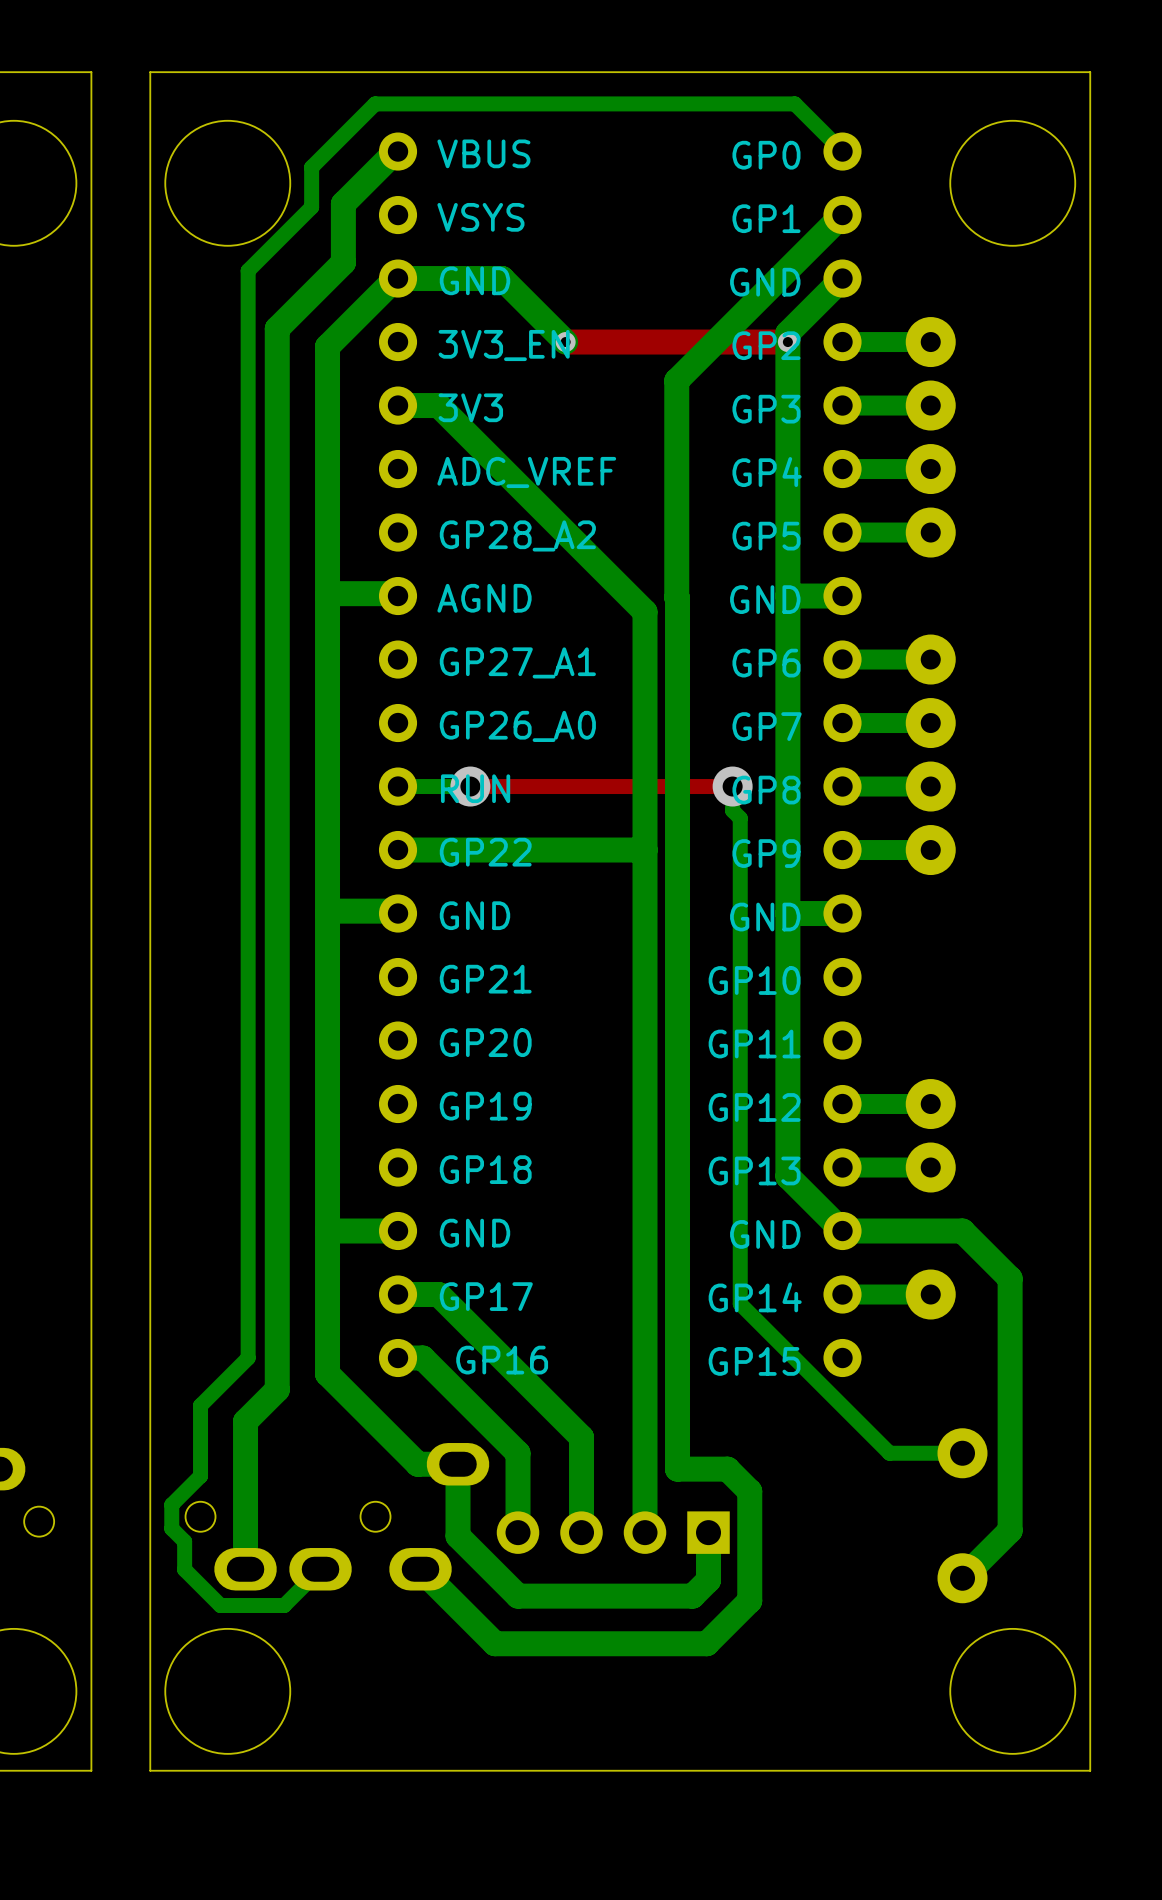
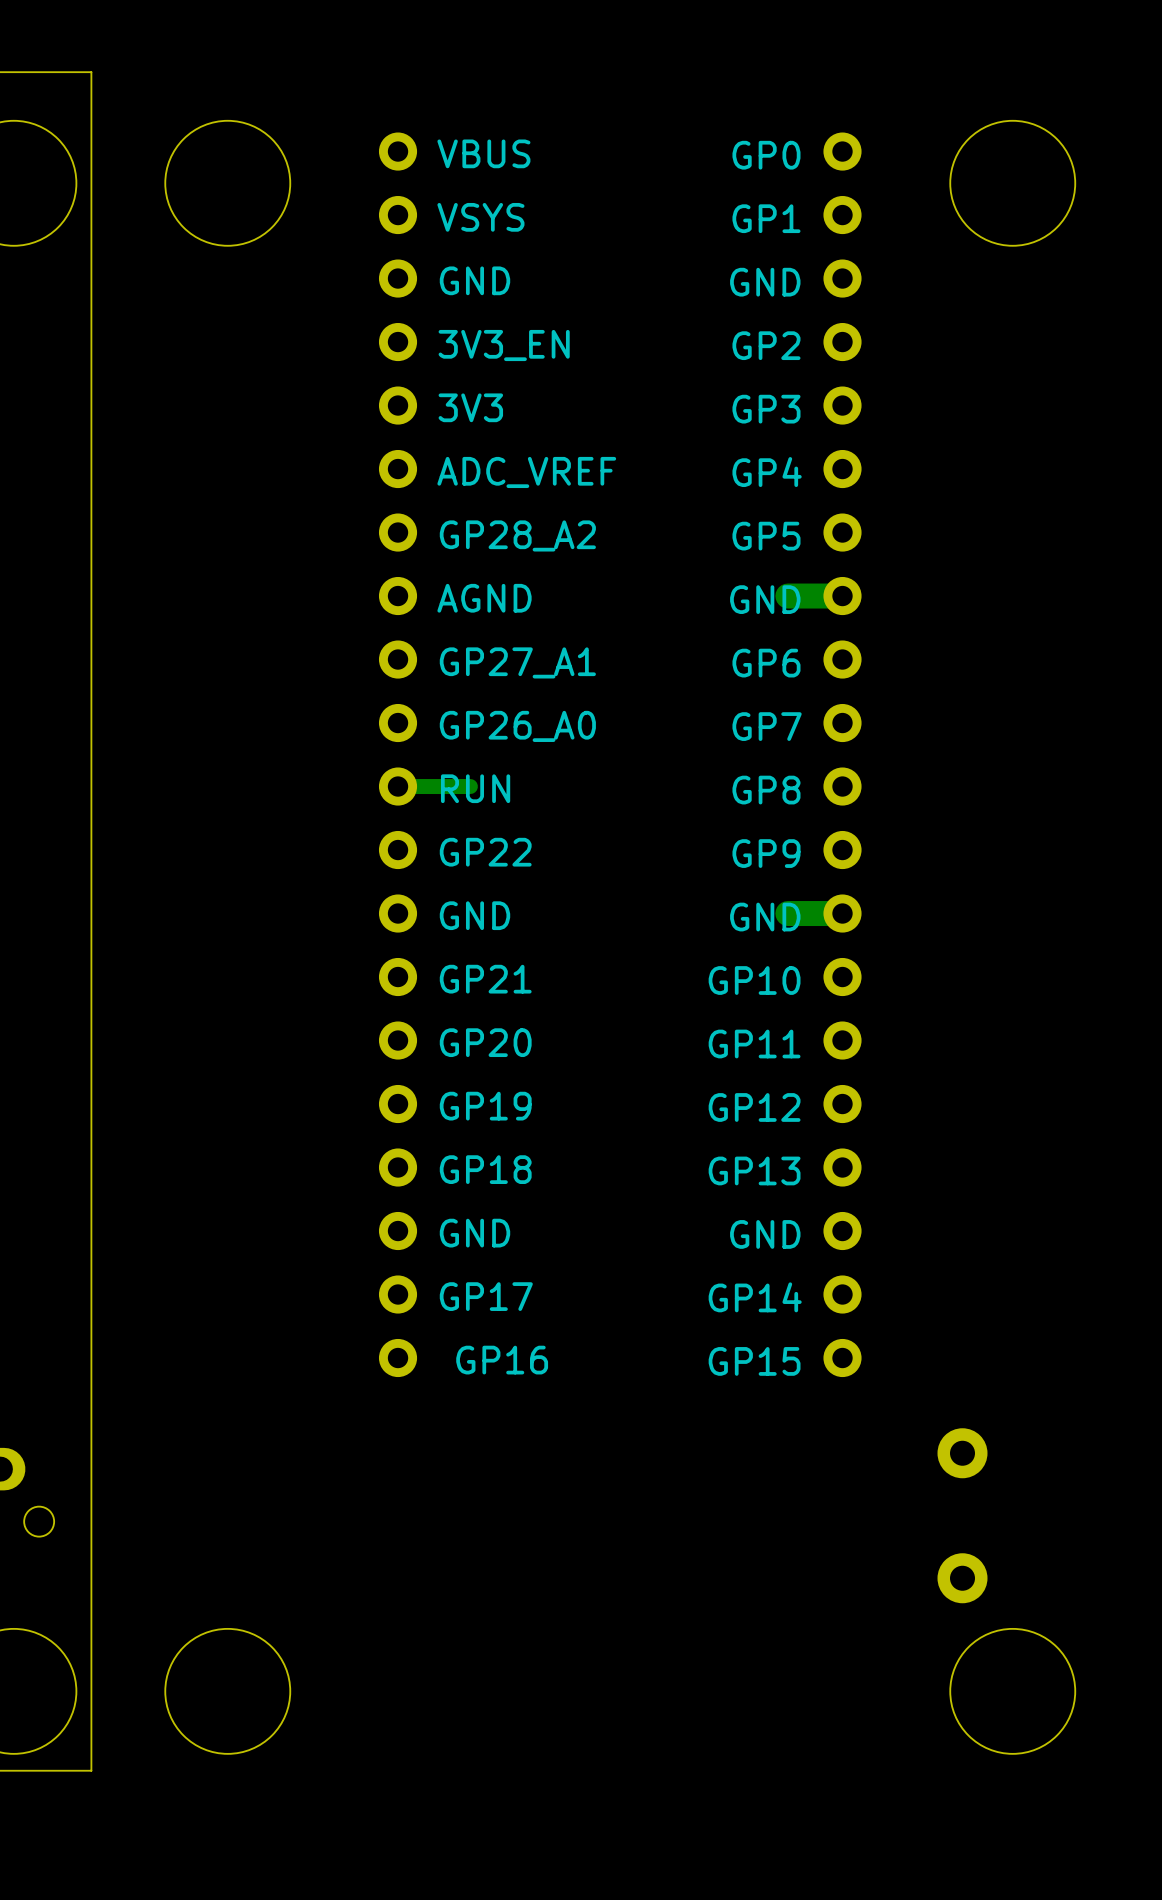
board edge: (1090, 72) (150, 72) (150, 1770) (1090, 1770) (1090, 72) -> none
bottom track: (398, 149) (343, 203) (343, 262) (277, 328) (277, 1389) (245, 1421) (245, 1569) -> none
bottom track: (842, 151) (794, 103) (375, 103) (311, 167) (311, 207) (248, 270) (248, 1358) (200, 1405) (200, 1476) (171, 1504) (171, 1528) (184, 1541) (184, 1569) (220, 1605) (284, 1605) (320, 1569) -> none
bottom track: (842, 215) (676, 380) (677, 1469) (727, 1469) (749, 1491) (749, 1600) (706, 1643) (495, 1643) (420, 1569) -> none
bottom track: (398, 276) (327, 346) (327, 1373) (417, 1464) (458, 1464) (458, 1536) (518, 1596) (692, 1596) (708, 1580) (708, 1532) -> none
bottom track: (398, 278) (502, 278) (565, 342) -> none
bottom track: (842, 278) (787, 333) (787, 1176) (842, 1231) (962, 1231) (1010, 1278) (1010, 1530) (962, 1578) -> none
via: (565, 342) -> none
top track: (787, 342) (565, 342) -> none
via: (787, 342) -> none
bottom track: (930, 342) (842, 342) -> none
part: (930, 342) -> none
bottom track: (398, 405) (438, 405) (645, 611) (645, 1532) -> none
bottom track: (930, 405) (842, 405) -> none
part: (930, 405) -> none
bottom track: (930, 469) (842, 469) -> none
part: (930, 469) -> none
bottom track: (930, 532) (842, 532) -> none
part: (930, 532) -> none
bottom track: (398, 593) (329, 593) (327, 596) -> none
bottom track: (930, 659) (842, 659) -> none
part: (930, 659) -> none
bottom track: (930, 723) (842, 723) -> none
part: (930, 723) -> none
via: (470, 786) -> none
bottom track: (732, 786) (732, 810) (740, 818) (740, 1303) (889, 1453) (962, 1453) -> none
top track: (732, 786) (470, 786) -> none
via: (732, 786) -> none
bottom track: (930, 786) (842, 786) -> none
part: (930, 786) -> none
bottom track: (645, 850) (398, 850) -> none
bottom track: (930, 850) (842, 850) -> none
part: (930, 850) -> none
bottom track: (398, 911) (329, 911) (327, 913) -> none
bottom track: (930, 1104) (842, 1104) -> none
part: (930, 1104) -> none
bottom track: (930, 1167) (842, 1167) -> none
part: (930, 1167) -> none
bottom track: (398, 1231) (327, 1231) -> none
bottom track: (398, 1294) (438, 1294) (581, 1437) (581, 1532) -> none
bottom track: (930, 1294) (842, 1294) -> none
part: (930, 1294) -> none
bottom track: (398, 1358) (422, 1358) (518, 1453) (518, 1532) -> none
part: (337, 1516) -> none
part: (613, 1532) -> none

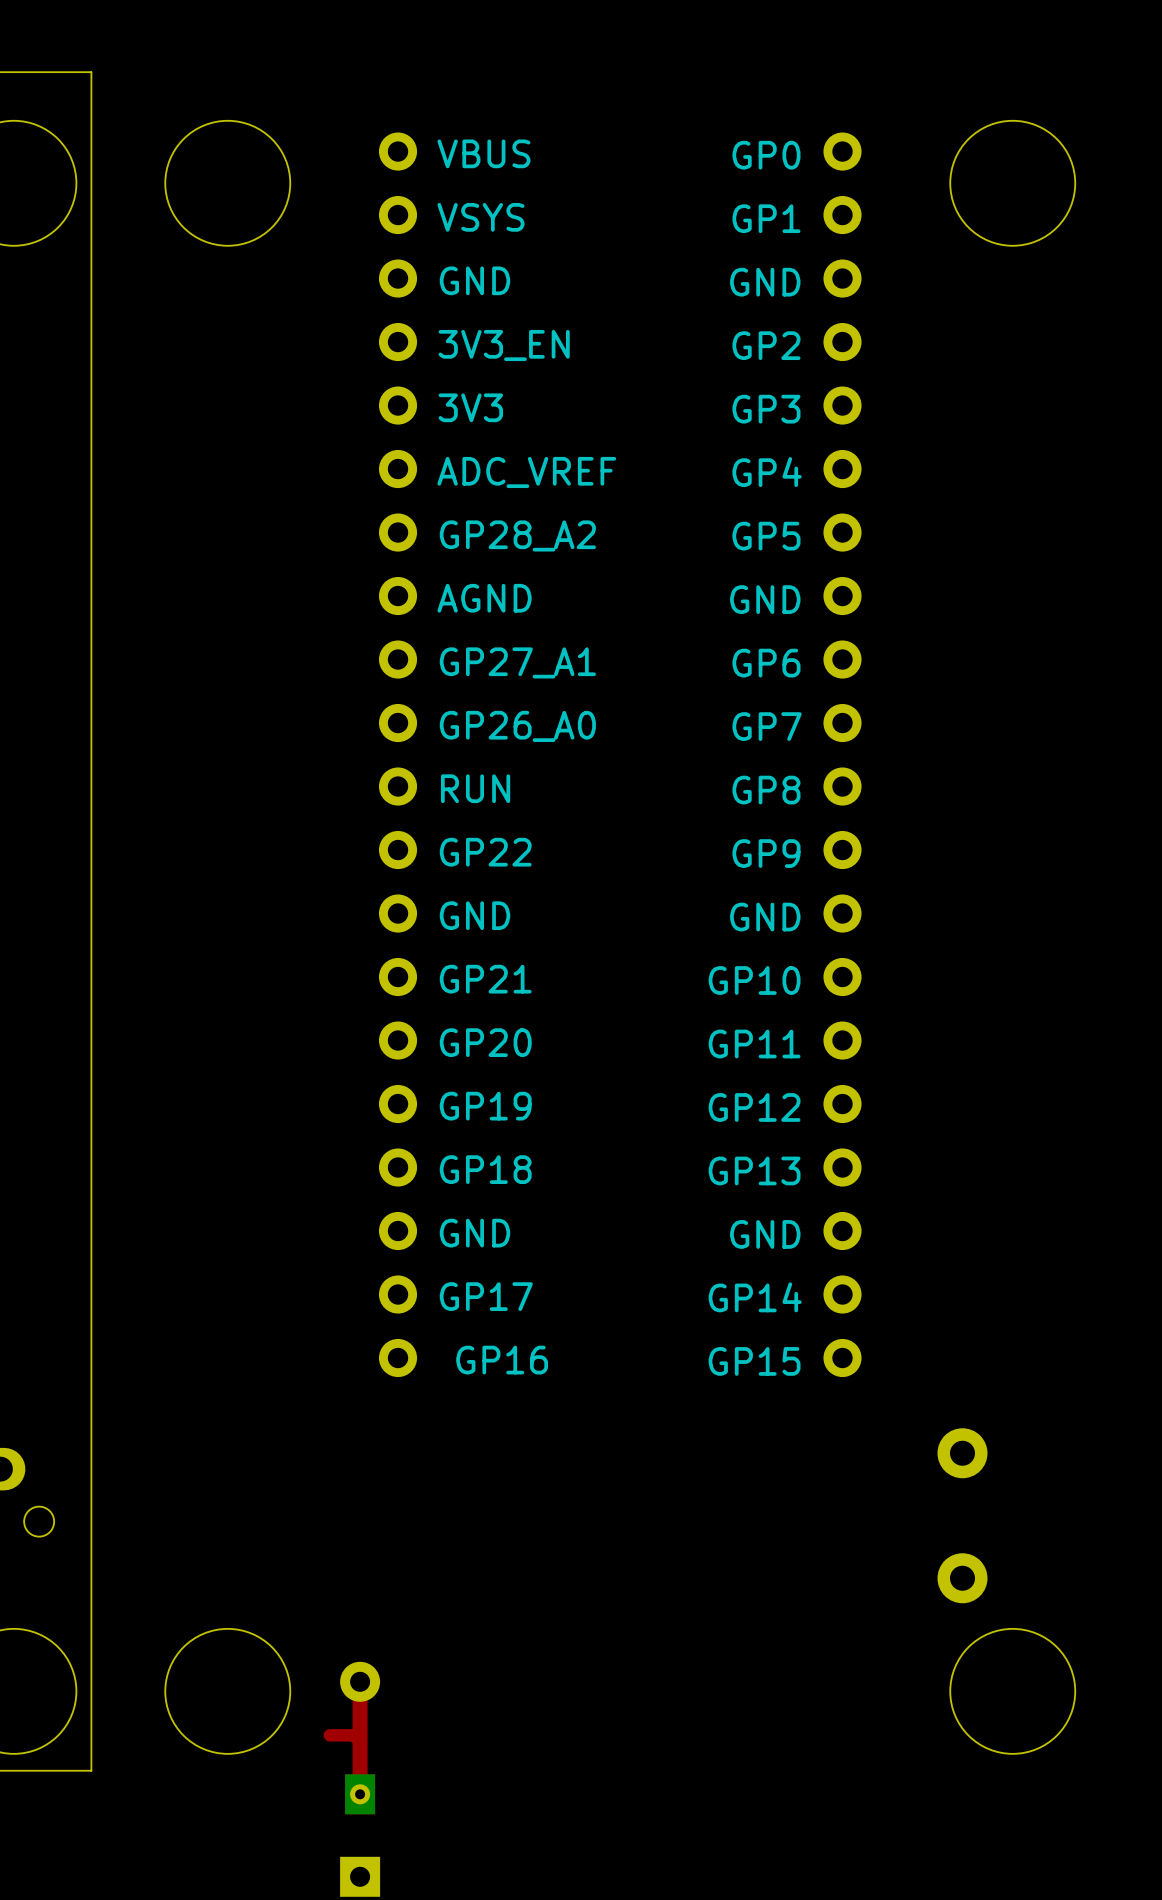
bottom track: (842, 596) (787, 596) -> none
bottom track: (470, 786) (398, 786) -> none
bottom track: (842, 913) (787, 913) -> none
top track: none -> (329, 1735) (353, 1735) (360, 1741)
part: none -> (360, 1779)

